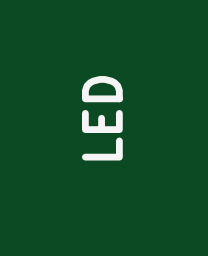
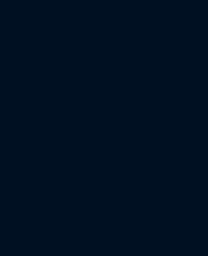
text: LED (102, 118) -> none

